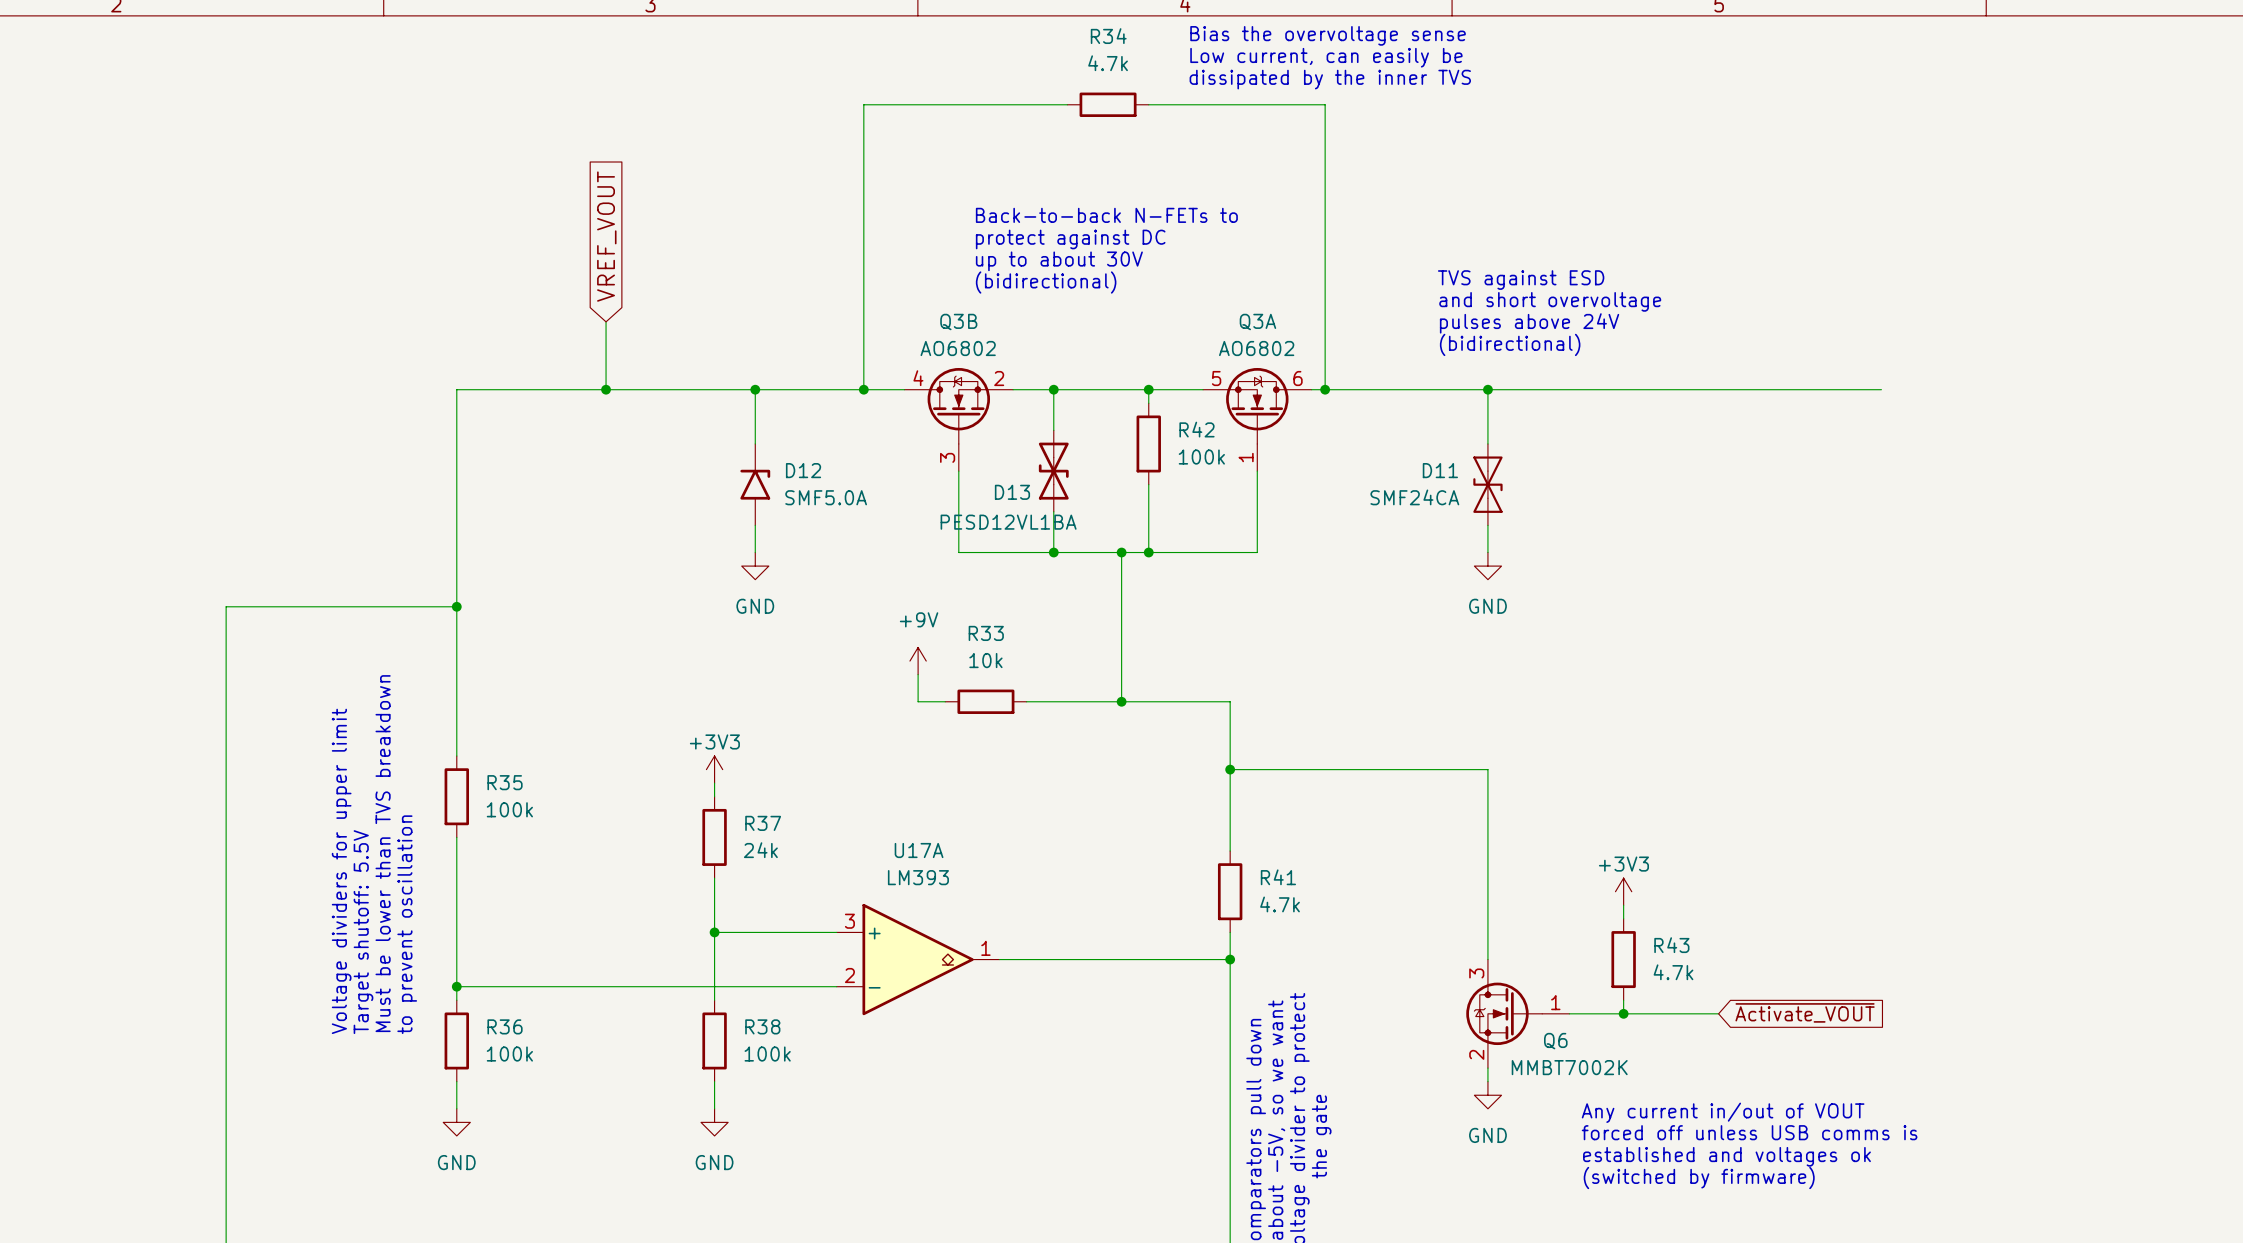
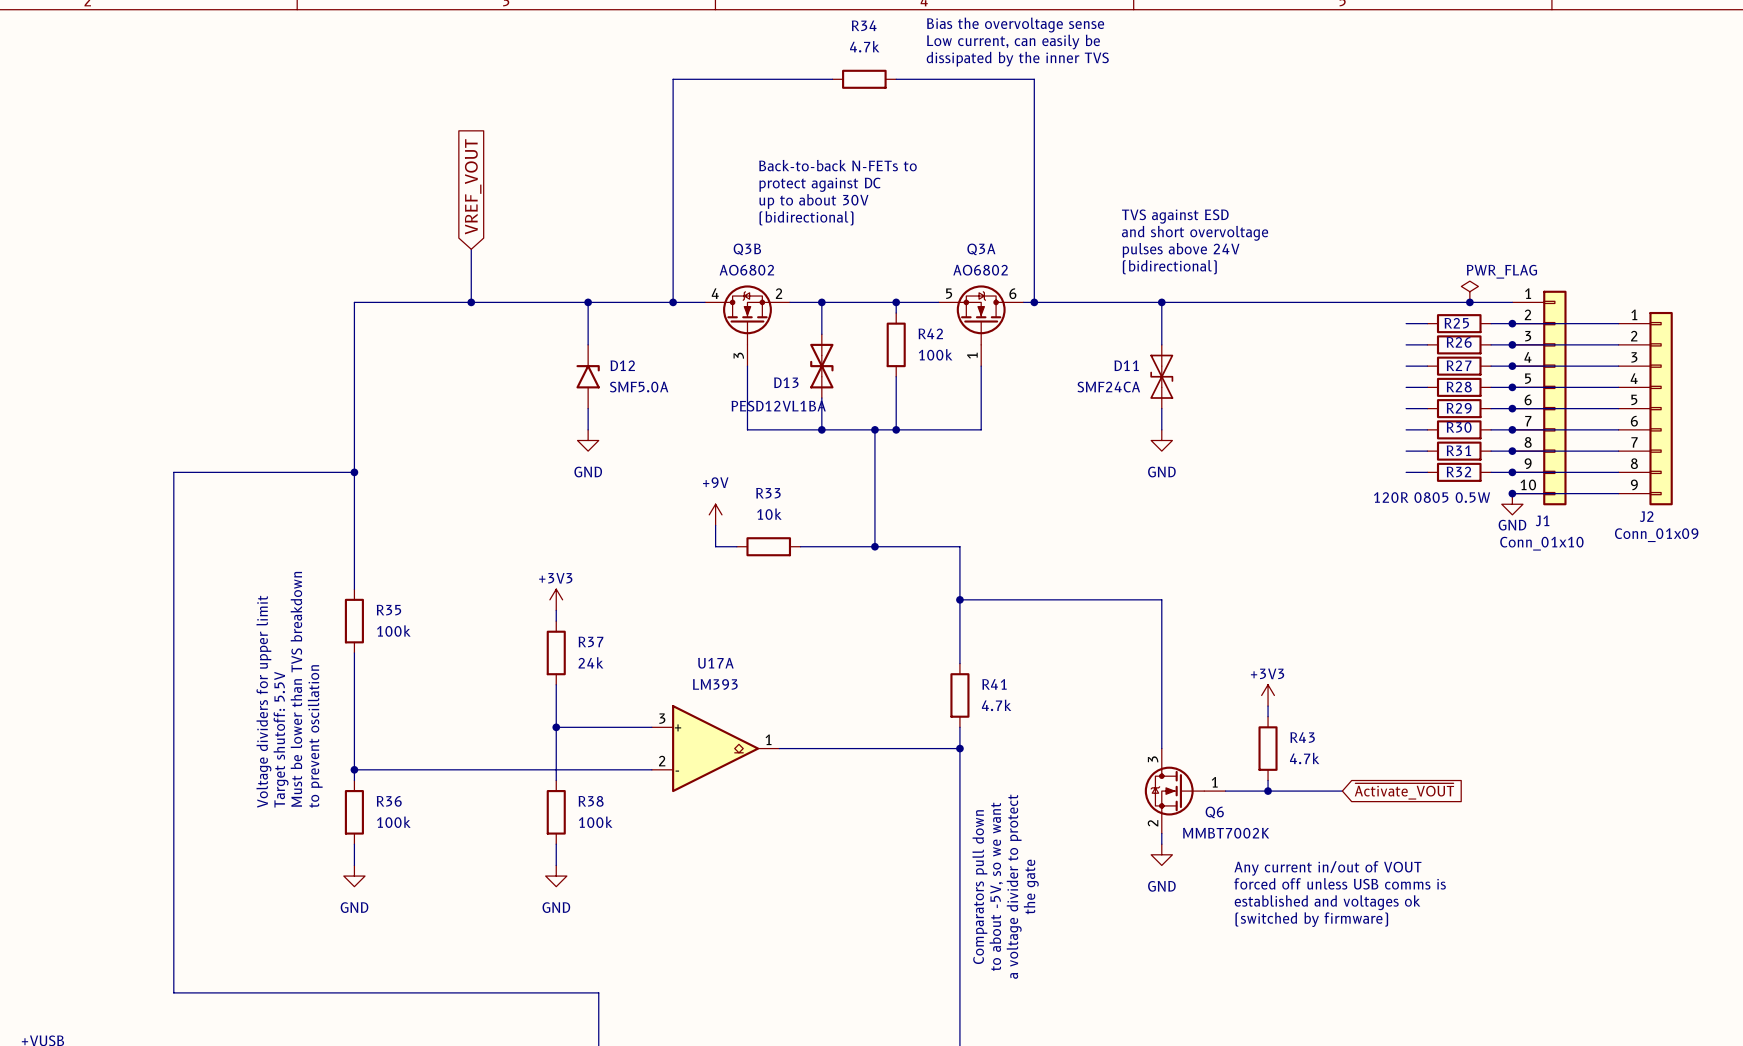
power symbol: none -> PWR_FLAG (1469, 291)
wire: none -> (1469, 302) (1512, 302)
junction: none -> (1469, 302)
wire: none -> (1406, 323) (1427, 323)
R25: none -> (1459, 323)
wire: none -> (1491, 323) (1618, 323)
junction: none -> (1512, 323)
wire: none -> (1406, 344) (1427, 344)
R26: none -> (1459, 344)
wire: none -> (1491, 344) (1618, 344)
junction: none -> (1512, 344)
wire: none -> (1406, 366) (1427, 366)
R27: none -> (1459, 366)
wire: none -> (1491, 366) (1618, 366)
junction: none -> (1512, 366)
wire: none -> (1406, 387) (1427, 387)
R28: none -> (1459, 387)
wire: none -> (1491, 387) (1618, 387)
junction: none -> (1512, 387)
J1: none -> Conn_01x10 (1539, 398)
wire: none -> (1406, 408) (1427, 408)
R29: none -> (1459, 408)
wire: none -> (1491, 408) (1618, 408)
junction: none -> (1512, 408)
J2: none -> Conn_01x09 (1645, 408)
wire: none -> (1406, 429) (1427, 429)
R30: none -> (1459, 429)
wire: none -> (1491, 429) (1618, 429)
junction: none -> (1512, 429)
wire: none -> (1406, 451) (1427, 451)
R31: none -> (1459, 451)
wire: none -> (1491, 451) (1618, 451)
junction: none -> (1512, 451)
wire: none -> (1406, 472) (1427, 472)
R32: none -> (1459, 472)
wire: none -> (1491, 472) (1618, 472)
junction: none -> (1512, 472)
wire: none -> (1512, 493) (1618, 493)
junction: none -> (1512, 493)
text: none -> 120R 0805 0.5W (1432, 497)
power symbol: none -> GND (1512, 504)

